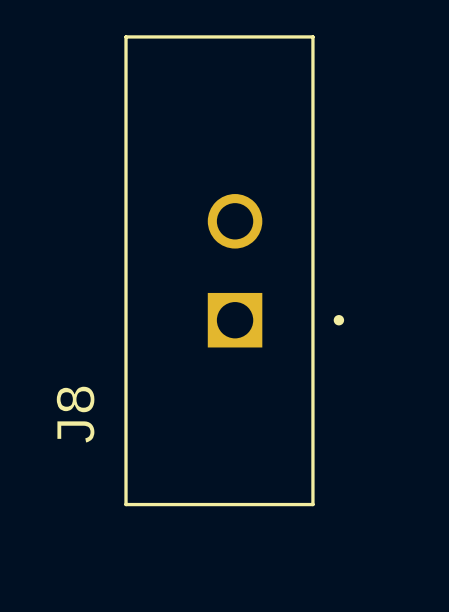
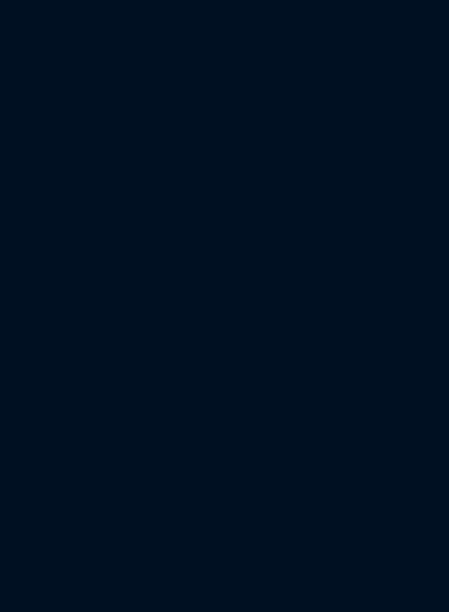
J8: (234, 270) -> none

